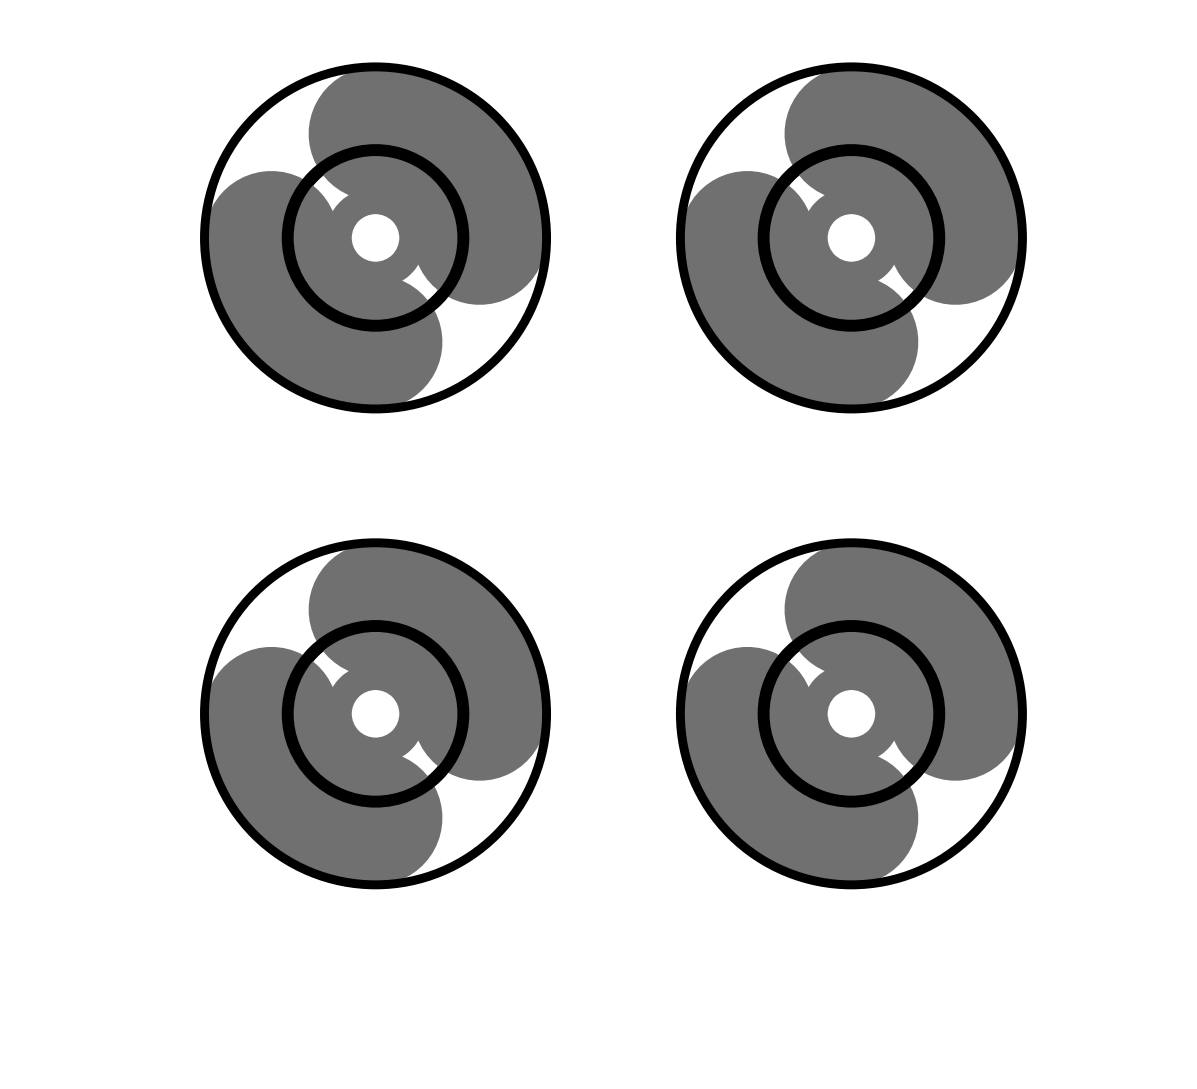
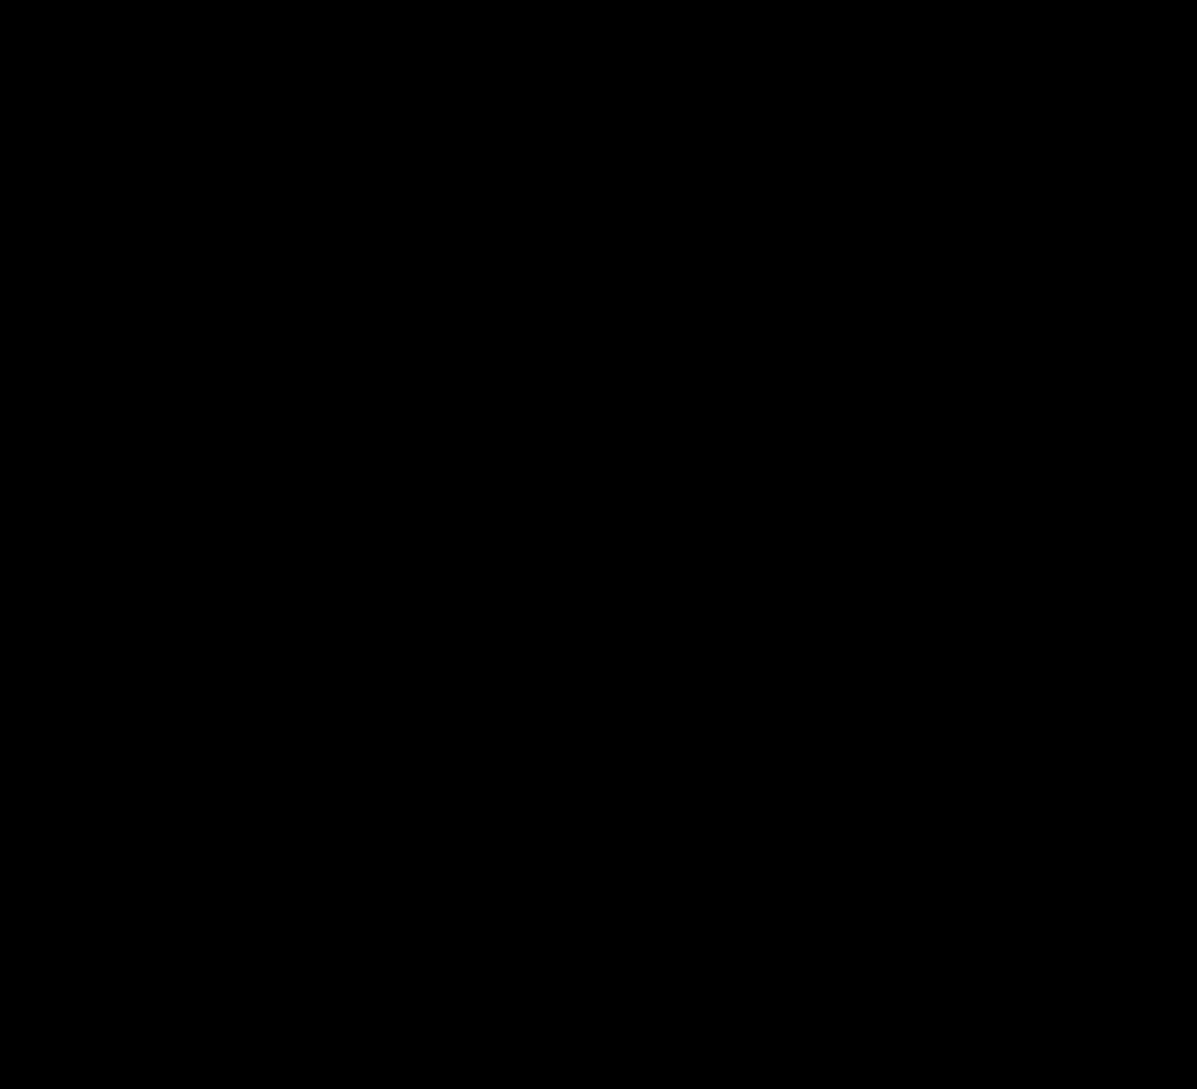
part: (375, 237) -> none
part: (851, 237) -> none
part: (375, 713) -> none
part: (851, 713) -> none

